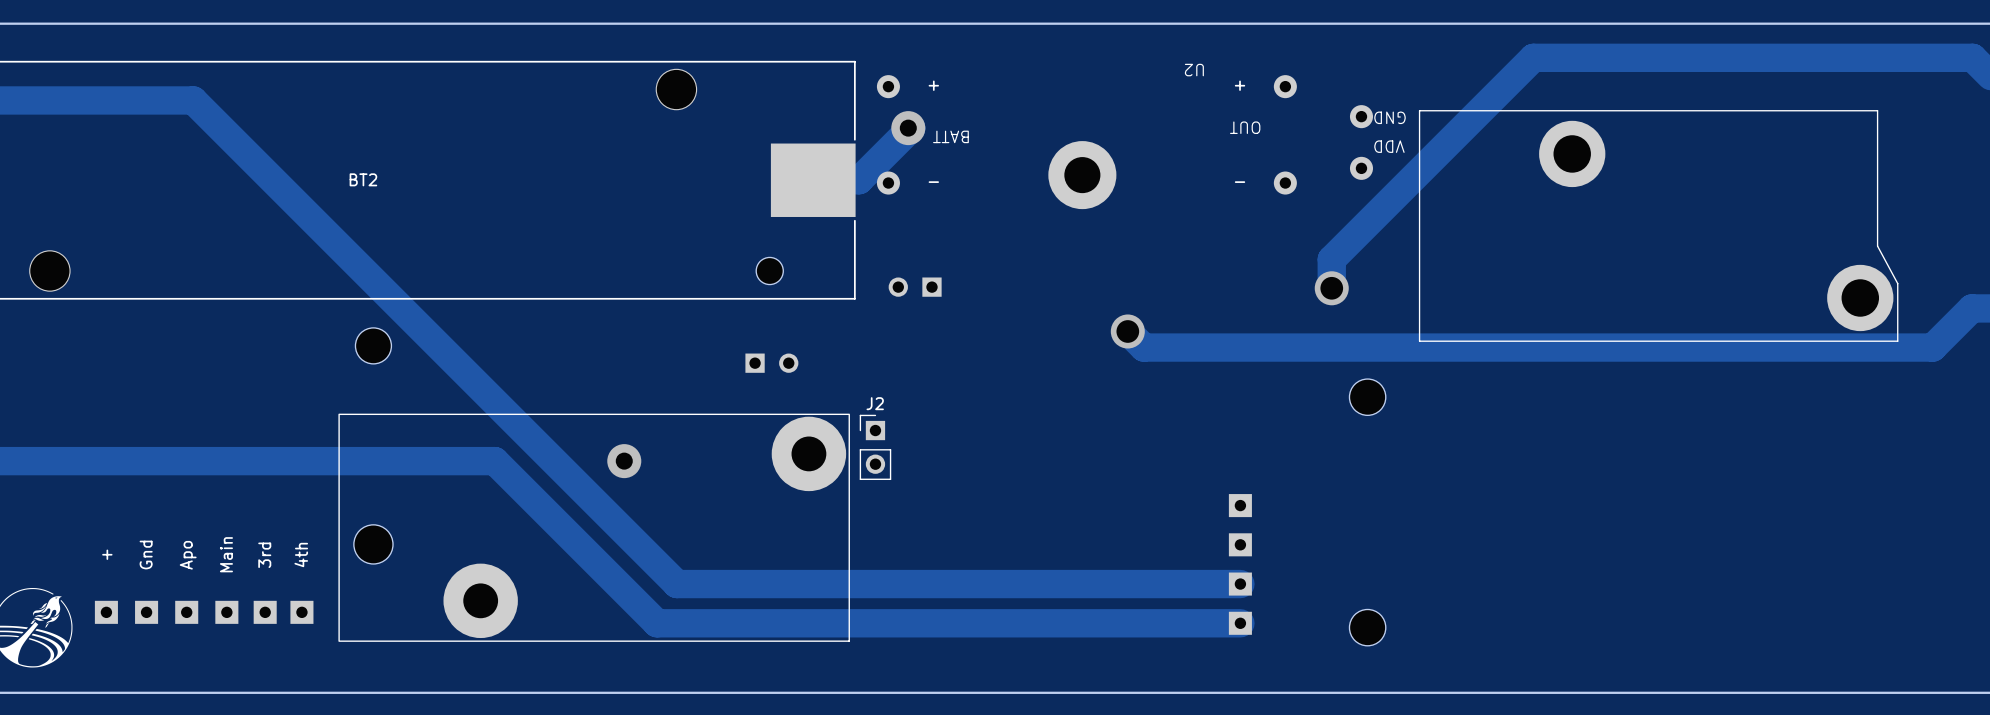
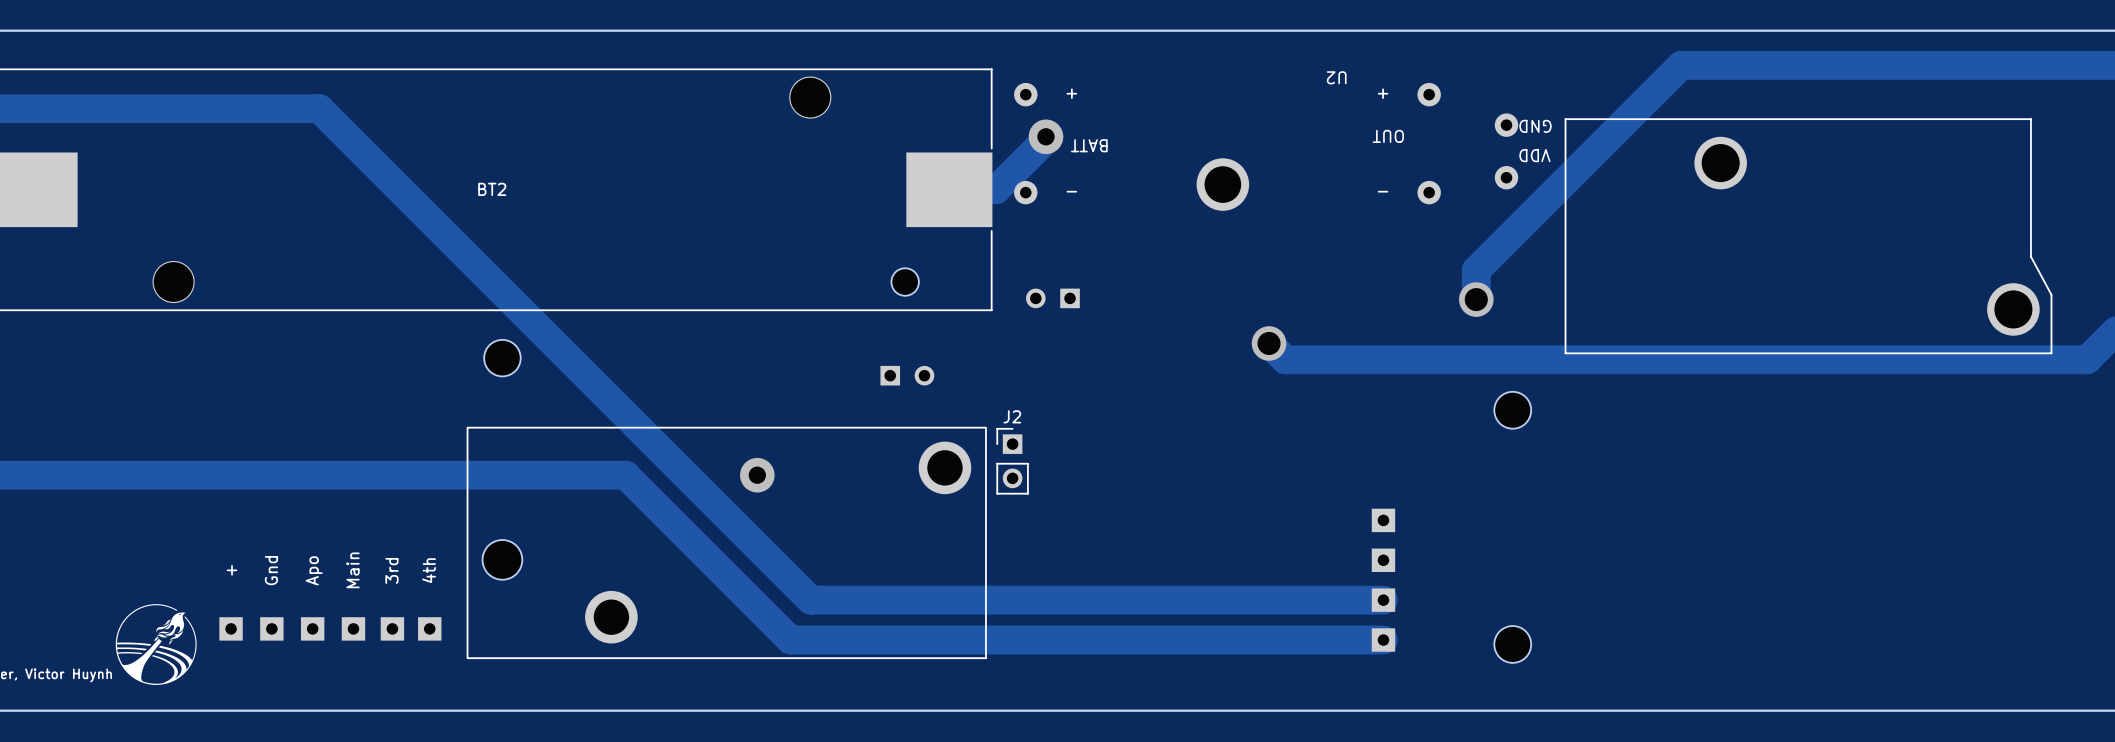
U2 footprint: [876, 75, 1297, 210] -> [1014, 82, 1441, 211]
part footprint: [1349, 105, 1899, 342] -> [1494, 113, 2053, 354]
part footprint: [94, 413, 850, 642] -> [219, 426, 987, 659]

